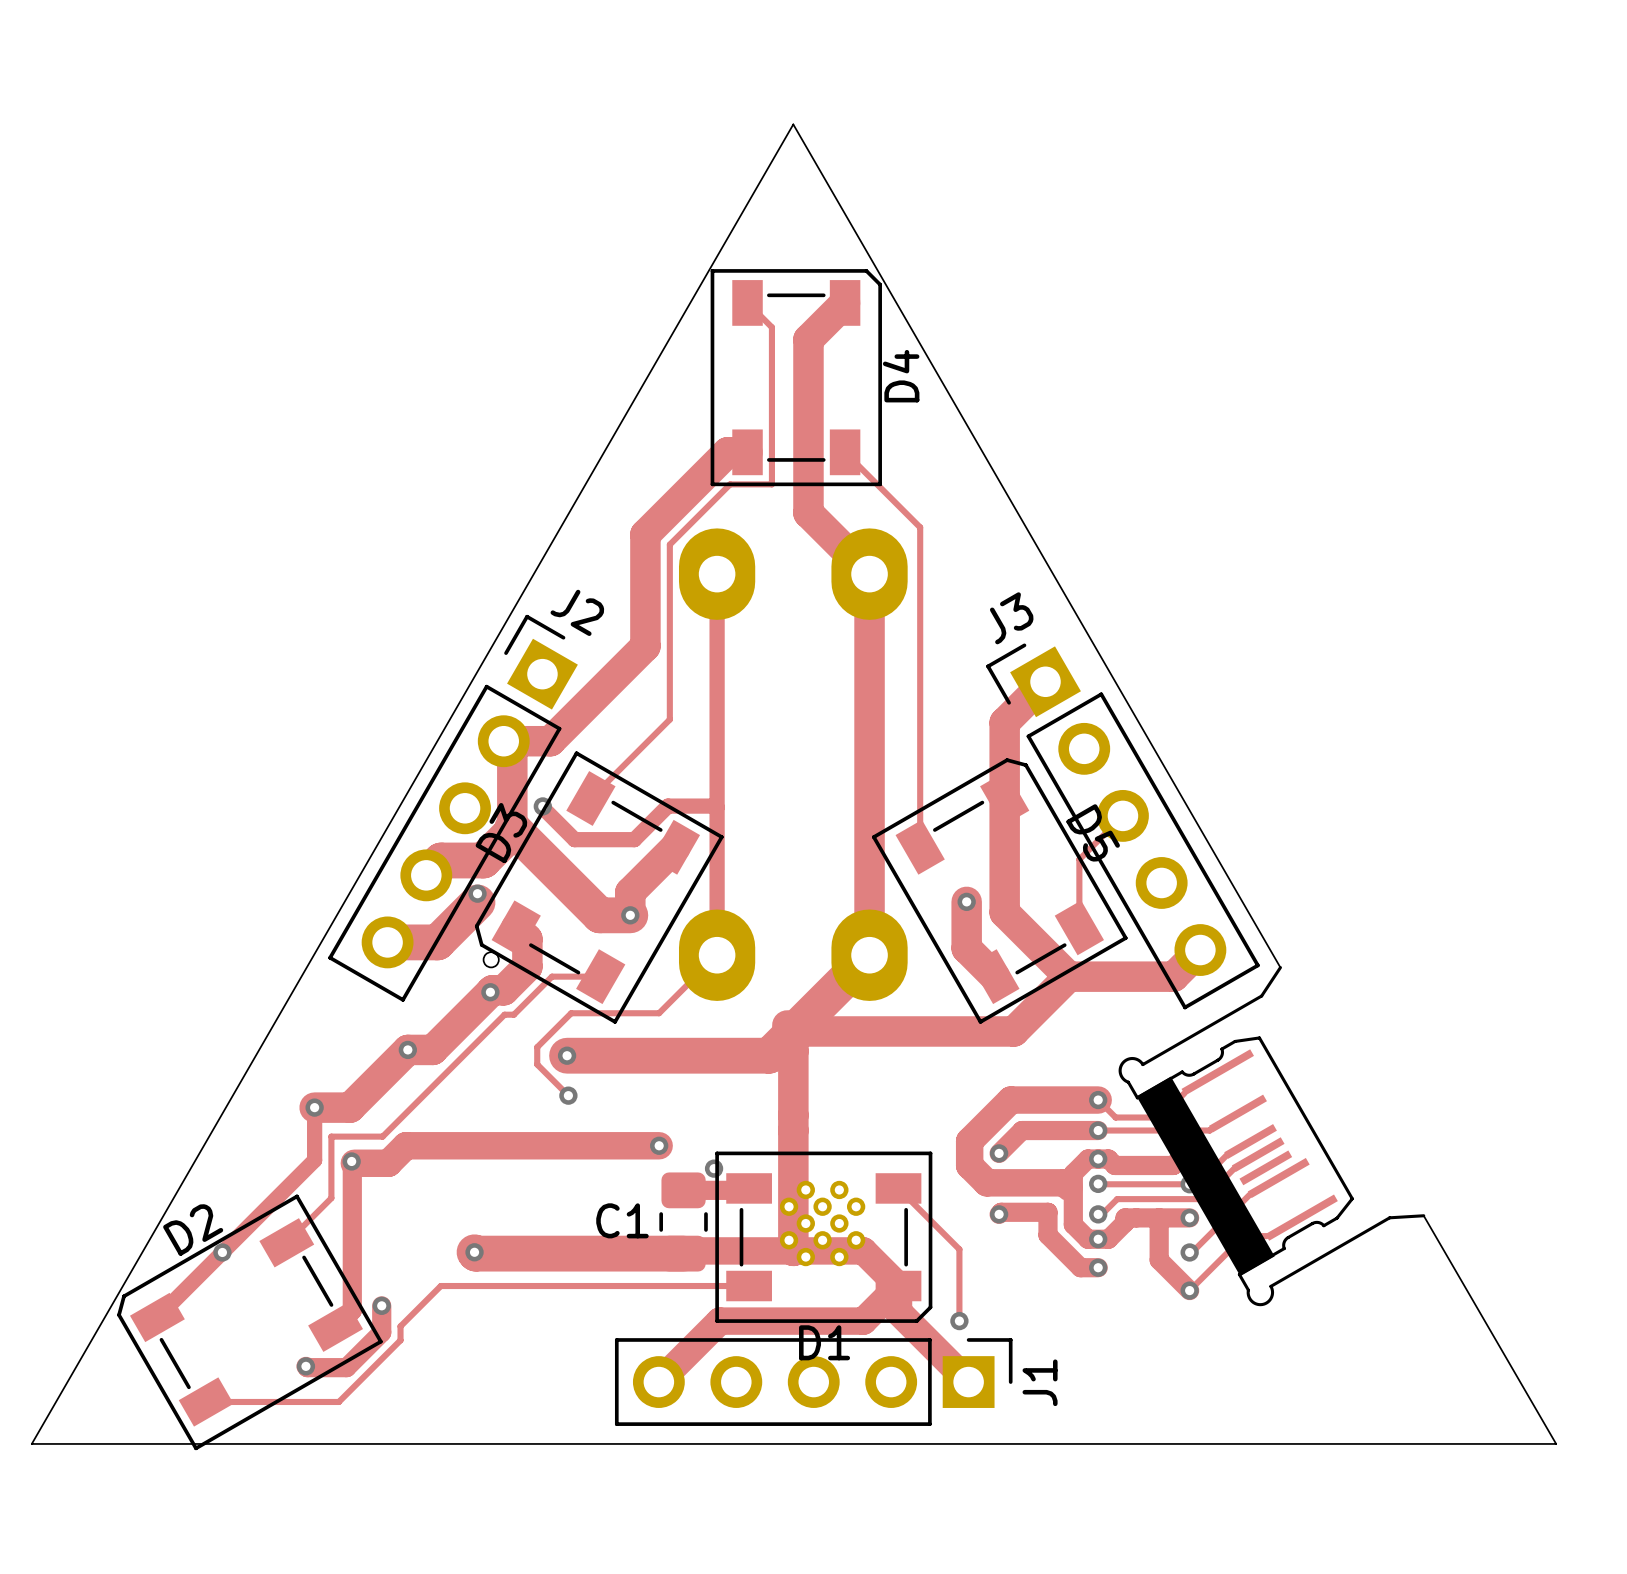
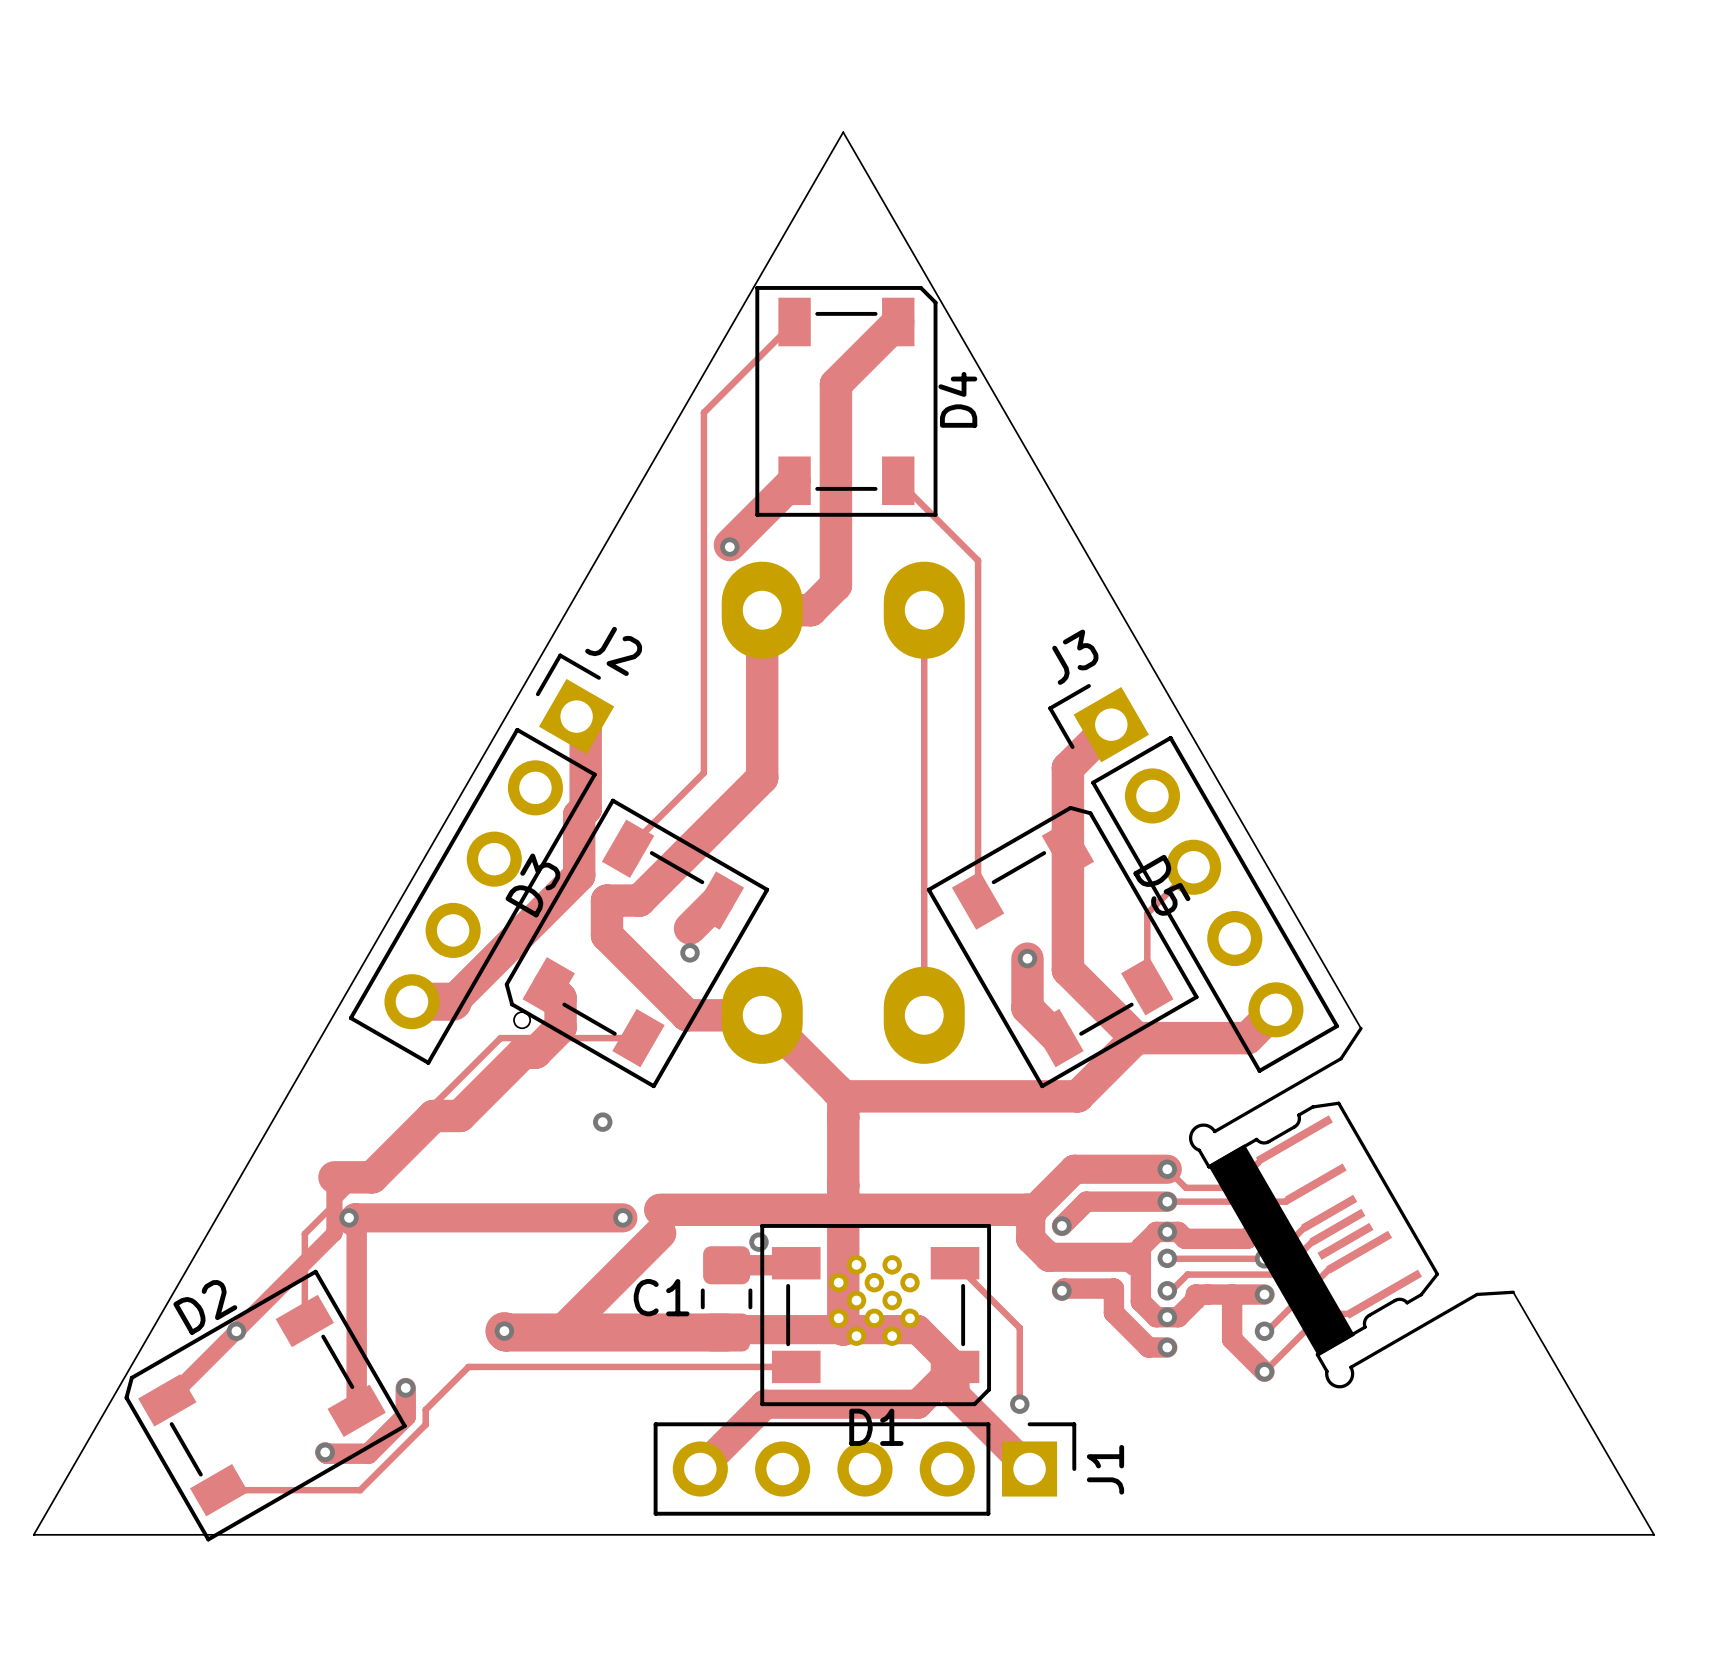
track: (747, 302) (771, 327) (771, 484) (730, 484) (669, 544) (669, 719) (662, 727) -> (794, 321) (703, 412) (703, 772)
track: (808, 339) (808, 513) (869, 574) -> (859, 360) (835, 384) (835, 585) (810, 610) (762, 610)
track: (747, 452) (727, 452) (645, 534) (645, 646) (550, 741) (503, 741) (512, 749) (512, 827) (599, 915) (630, 915) (630, 892) (649, 873) -> (794, 480) (729, 545)
via: none -> (729, 547)
track width: thin (717, 574) (717, 731) (717, 574) -> thick (762, 610) (762, 777) (762, 610)
track width: thick (869, 574) (869, 955) -> thin (924, 610) (924, 1015)
track: none -> (762, 777) (639, 900) (606, 900) (606, 935) (686, 1015) (762, 1015) (836, 1089)
track: (542, 806) (574, 839) (634, 839) (667, 806) (717, 807) -> none
via: (542, 806) -> none
track: (514, 829) (483, 860) (441, 860) (426, 875) -> none
via: (477, 893) -> none
track: (477, 902) (437, 942) (426, 942) -> (576, 716) (585, 725) (585, 808) (579, 815) (579, 875) (452, 1001)
via position: (630, 915) -> (690, 952)
track: (717, 955) (717, 731) (717, 955) -> none
track: (717, 955) (659, 1013) (571, 1013) (537, 1047) (537, 1064) (568, 1095) -> none
track: (869, 955) (769, 1055) (567, 1055) -> none
track: (551, 976) (513, 1014) (504, 1014) (382, 1136) (331, 1136) (331, 1198) (286, 1242) -> (586, 1038) (500, 1038) (304, 1233) (304, 1320)
via: (490, 992) -> none
via: (407, 1049) -> none
via: (568, 1095) -> none
via: (314, 1107) -> none
track: none -> (660, 1209) (1027, 1209) (1030, 1213)
via: none -> (349, 1217)
track: (405, 1145) (388, 1163) (354, 1163) -> (431, 1217) (355, 1217) (352, 1220)
track: (586, 1145) (659, 1145) -> none
via: none -> (622, 1217)
via: (659, 1145) -> none
track: none -> (660, 1233) (562, 1331)
track: (351, 1161) (352, 1310) (335, 1327) -> (349, 1217) (356, 1225) (356, 1410)
via: (351, 1161) -> none

